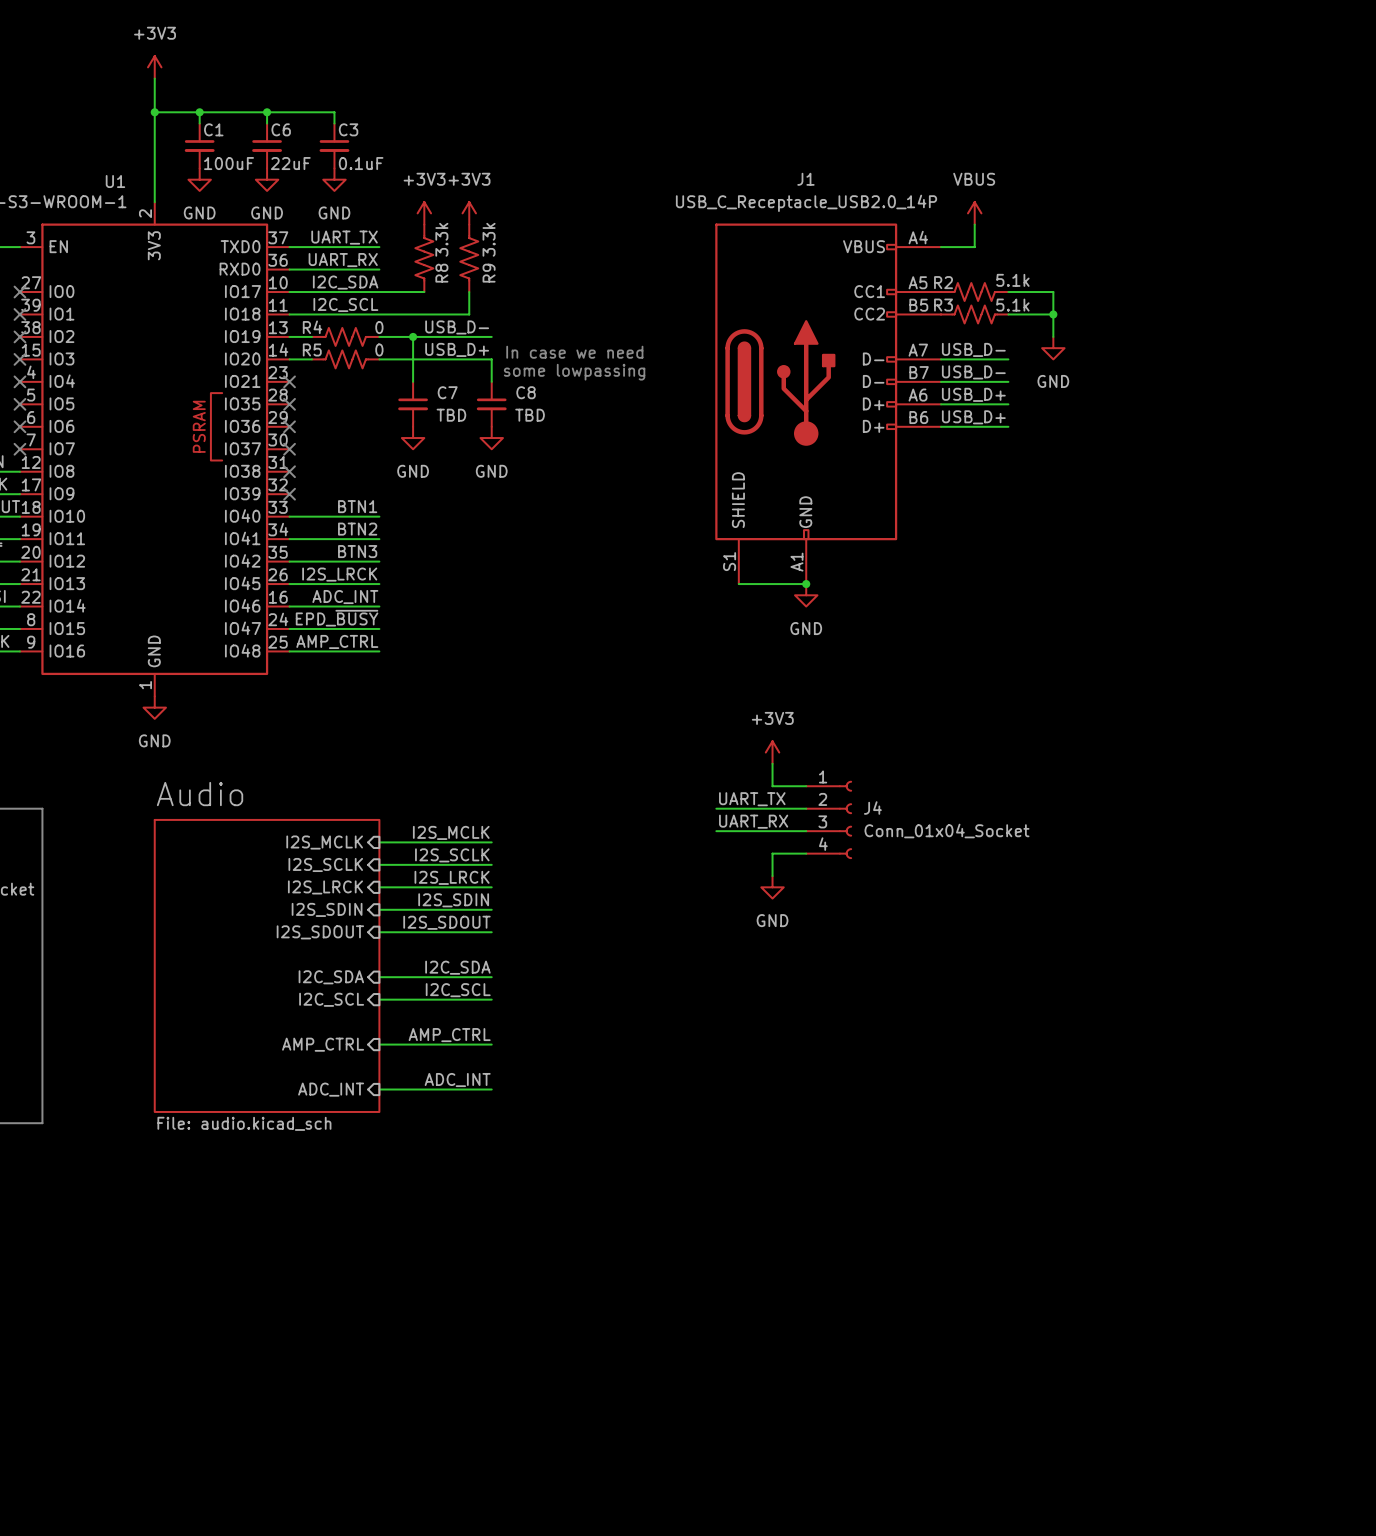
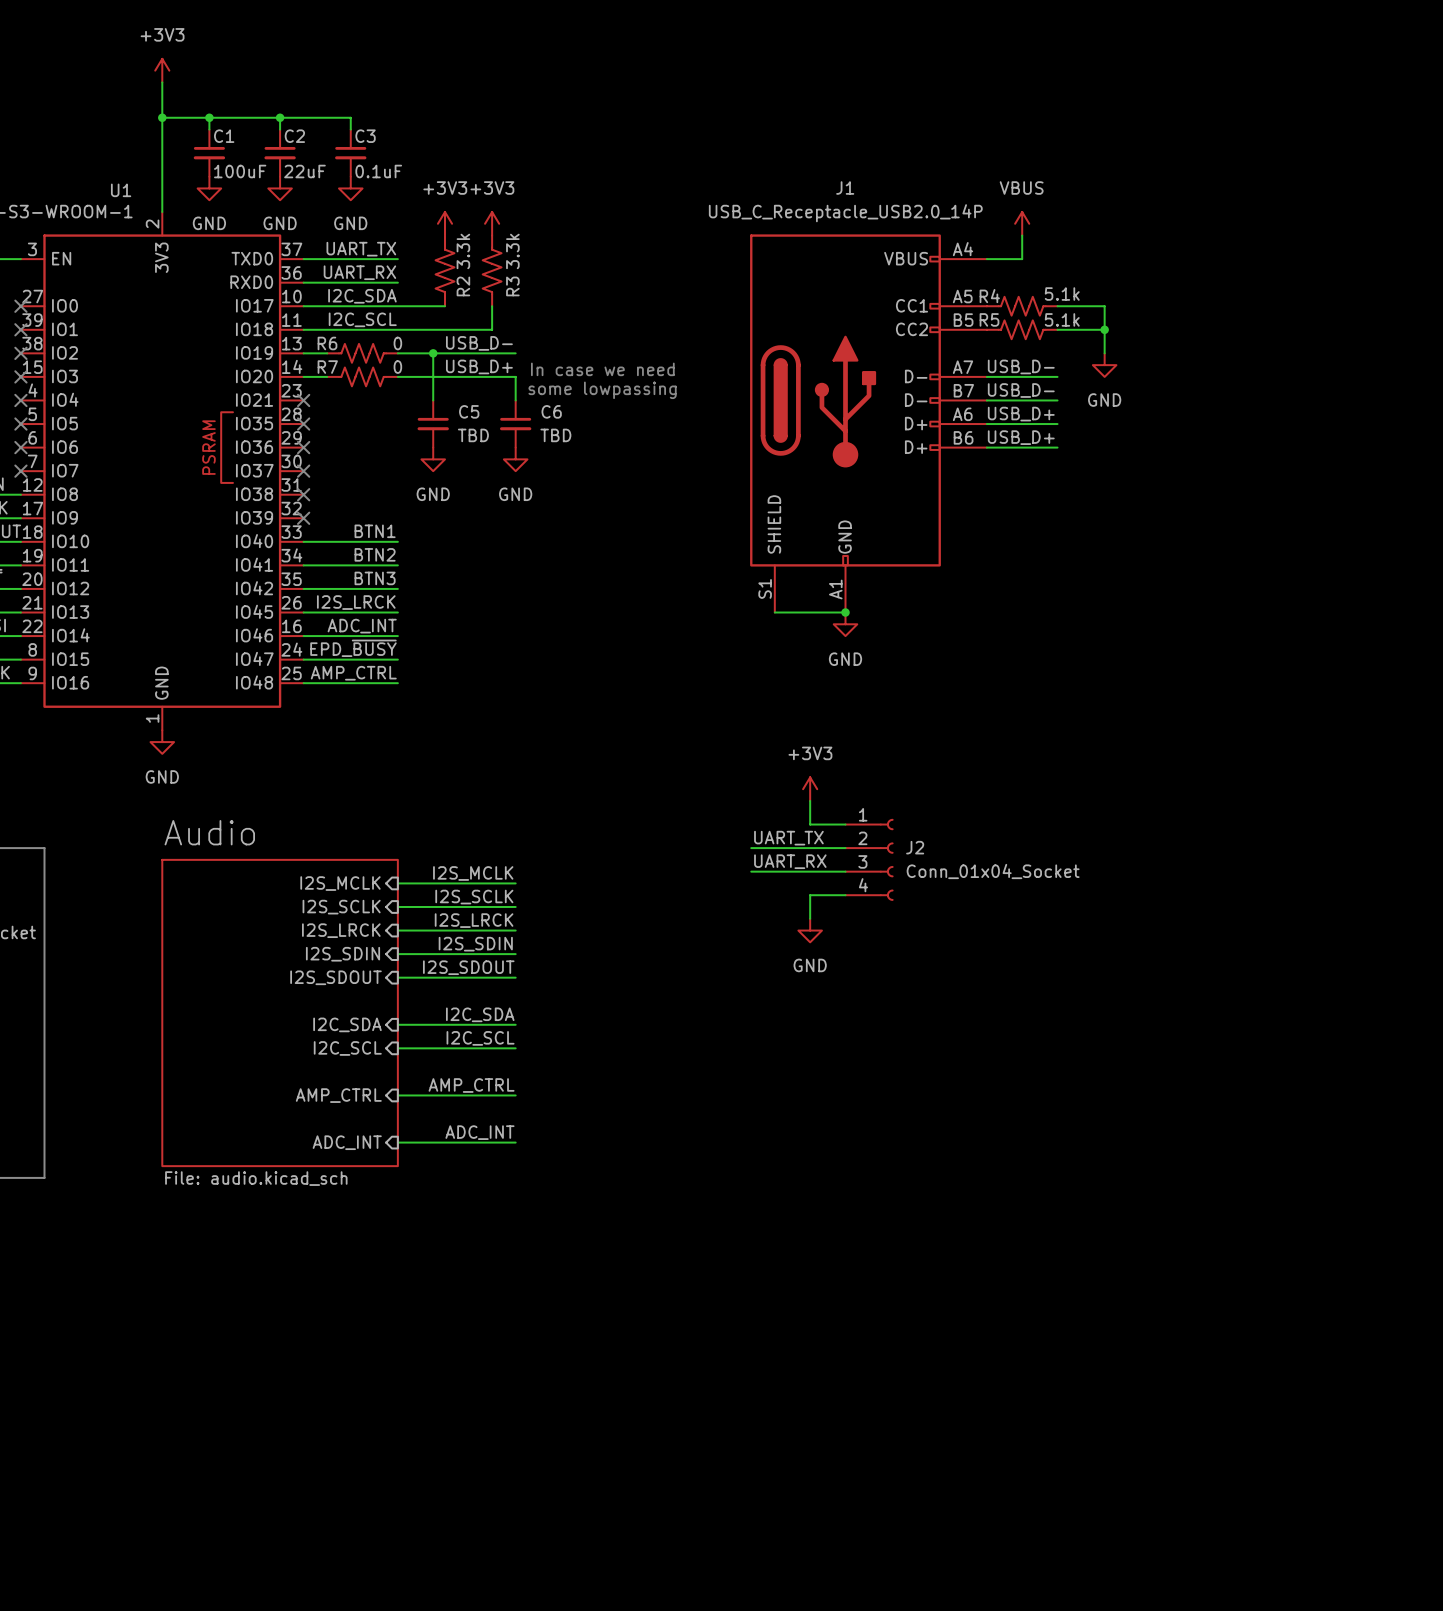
C6 name: C6 (281, 129) -> C2 (294, 136)
R8 name: R8 (441, 273) -> R2 (463, 286)
R9 name: R9 (489, 273) -> R3 (512, 286)
R2 name: R2 (943, 282) -> R4 (989, 296)
R3 name: R3 (943, 305) -> R5 (989, 319)
R4 name: R4 (312, 327) -> R6 (327, 343)
R5 name: R5 (312, 350) -> R7 (327, 367)
C7 name: C7 (447, 392) -> C5 (469, 411)
C8 name: C8 (526, 392) -> C6 (551, 411)
J4 name: J4 (872, 808) -> J2 (915, 847)

